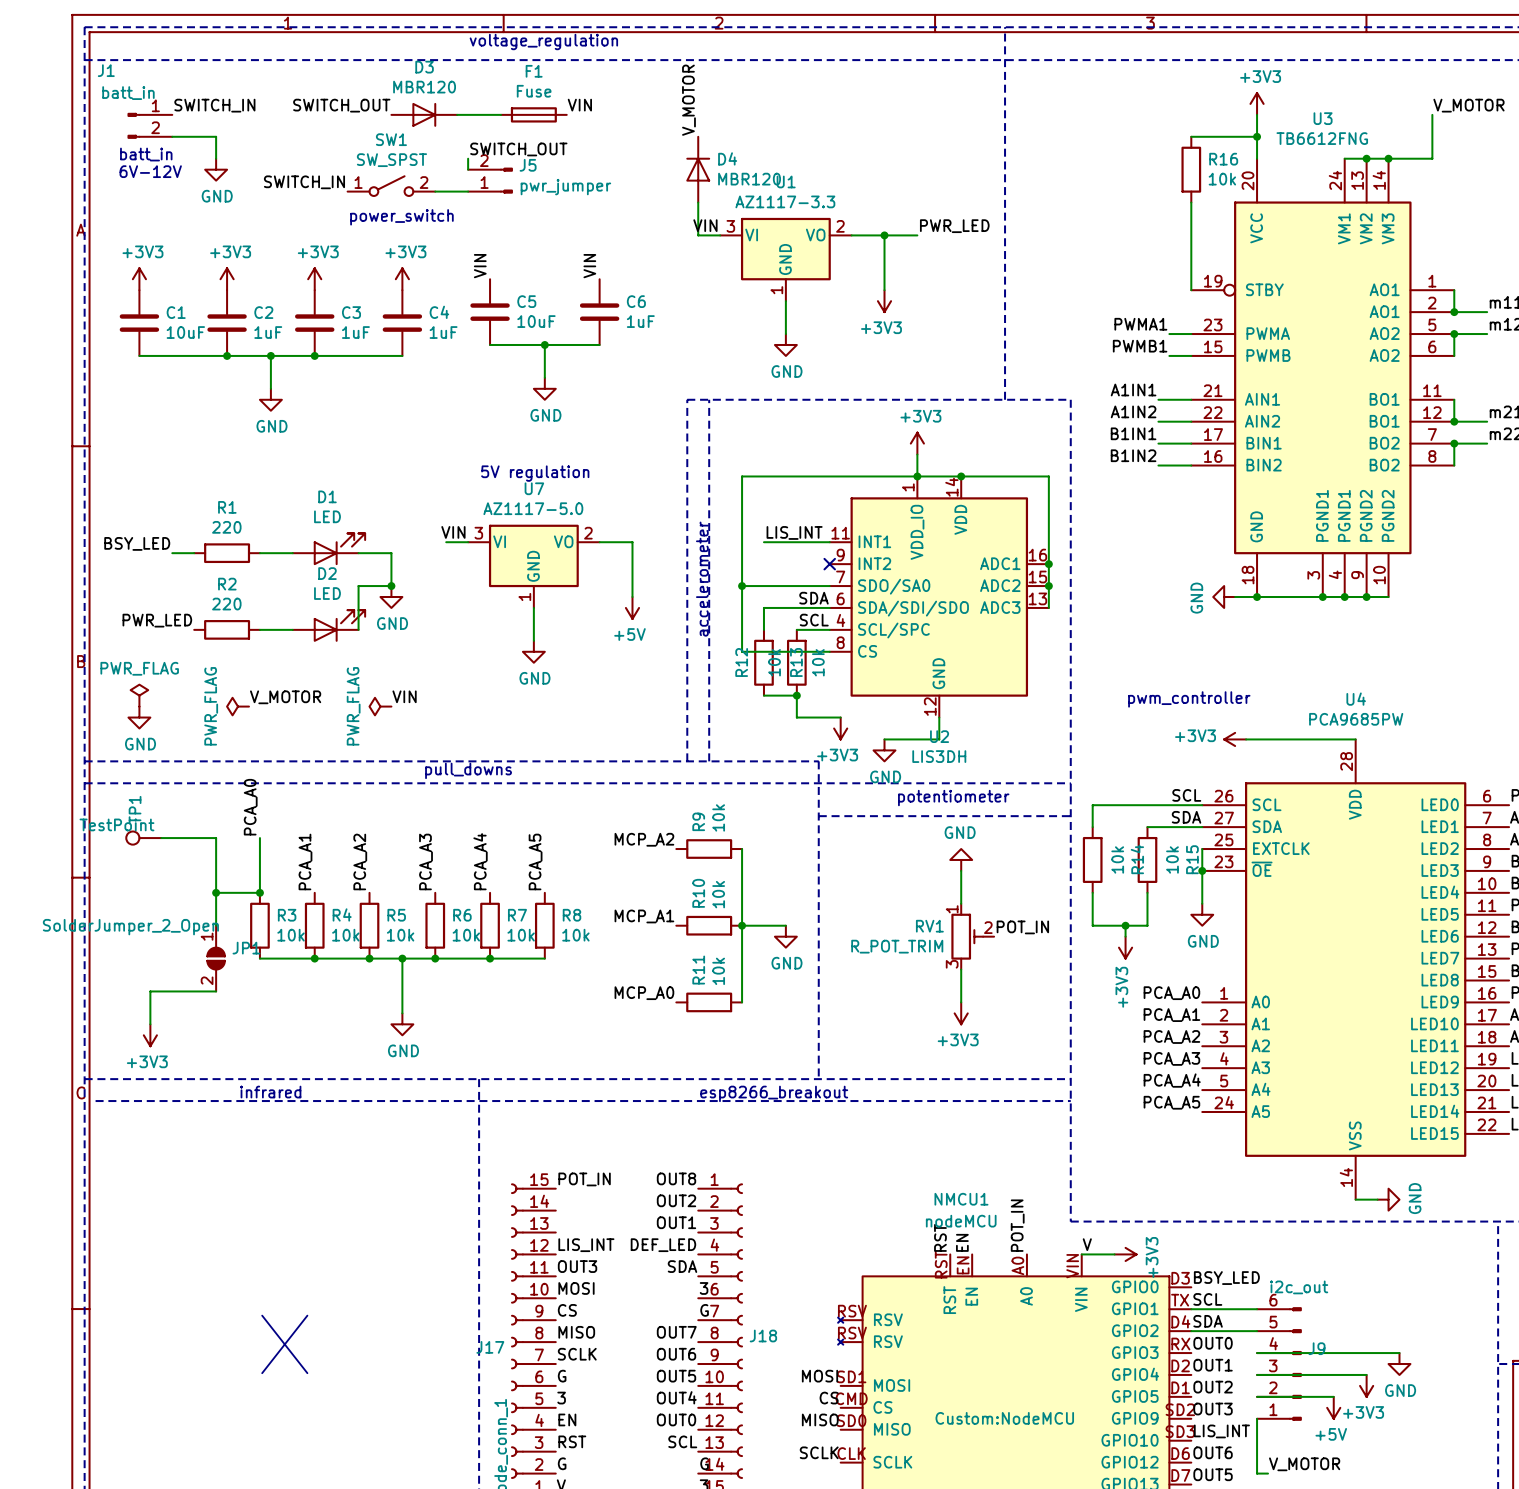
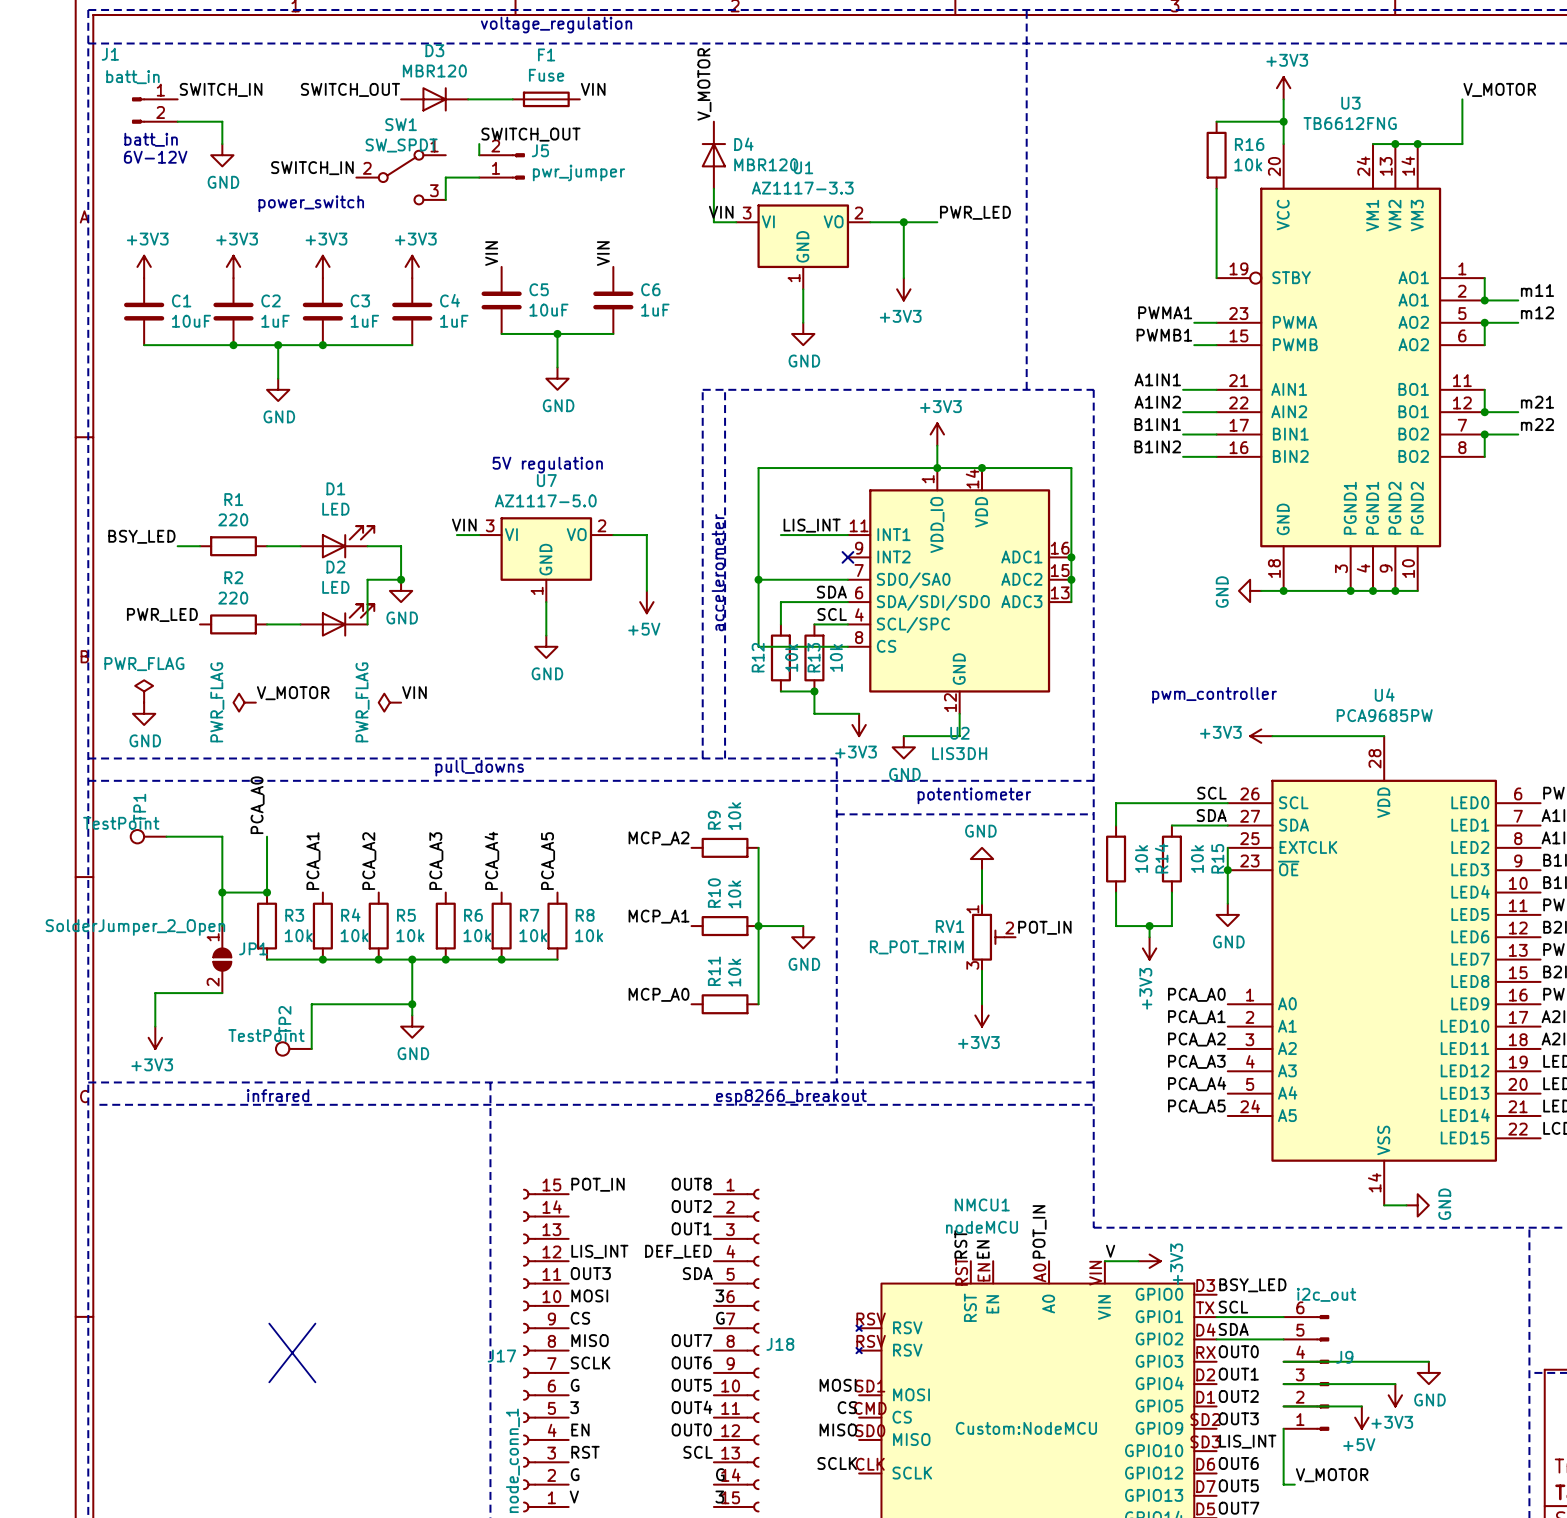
SW1 value: SW_SPST (391, 160) -> SW_SPDT (401, 145)
SW1 symbol: [347, 176, 436, 196] -> [356, 150, 446, 205]
wire: none -> (445, 177) (445, 199)
text position: power_switch (401, 217) -> power_switch (311, 203)
wire: none -> (412, 1004) (311, 1004) (311, 1048)
junction: none -> (412, 1004)
TP2: none -> TestPoint (293, 1048)

